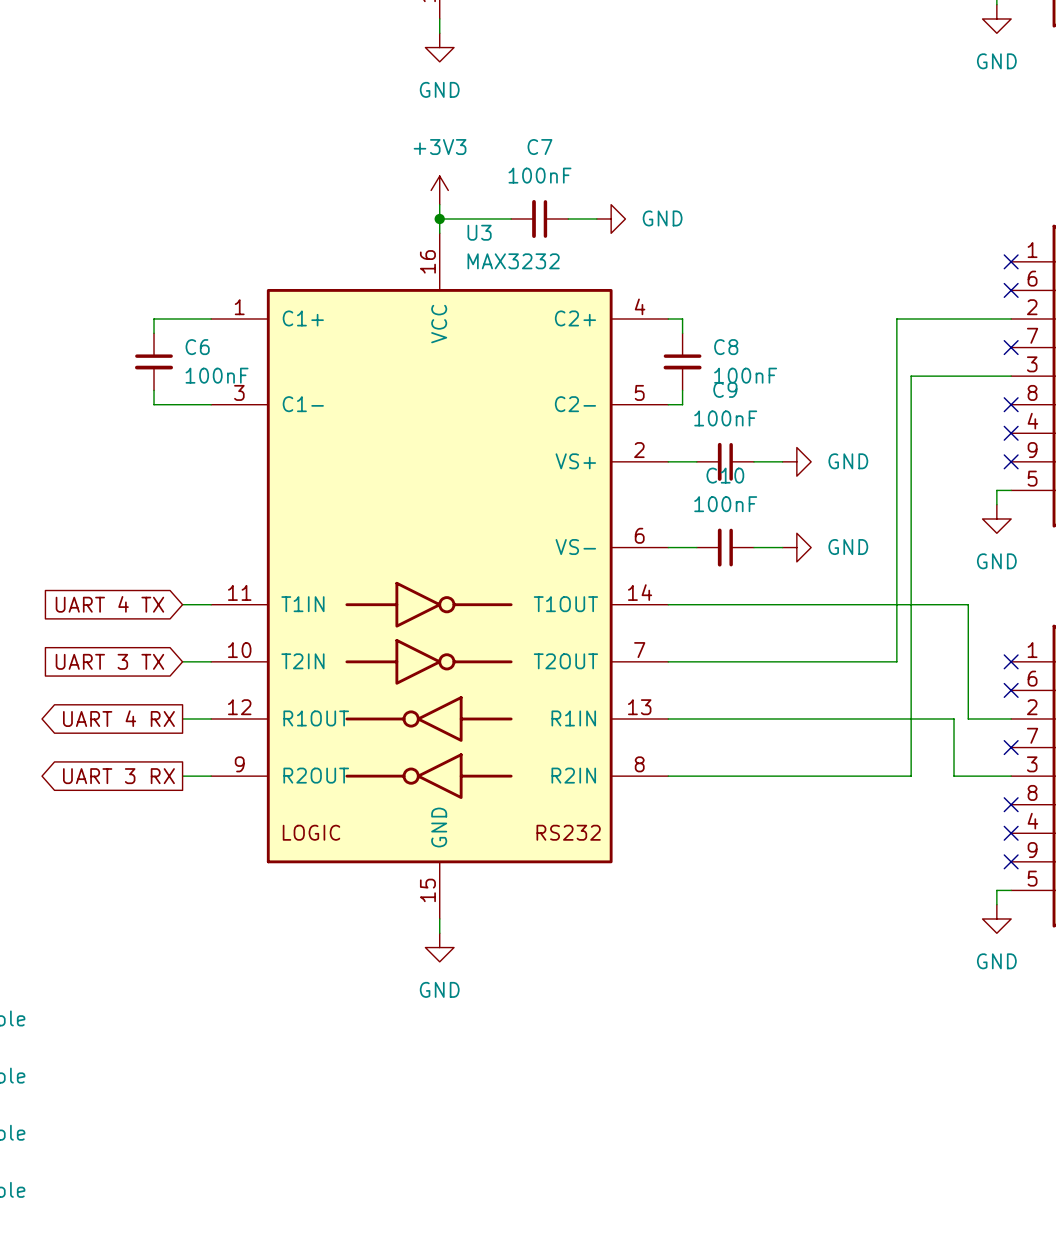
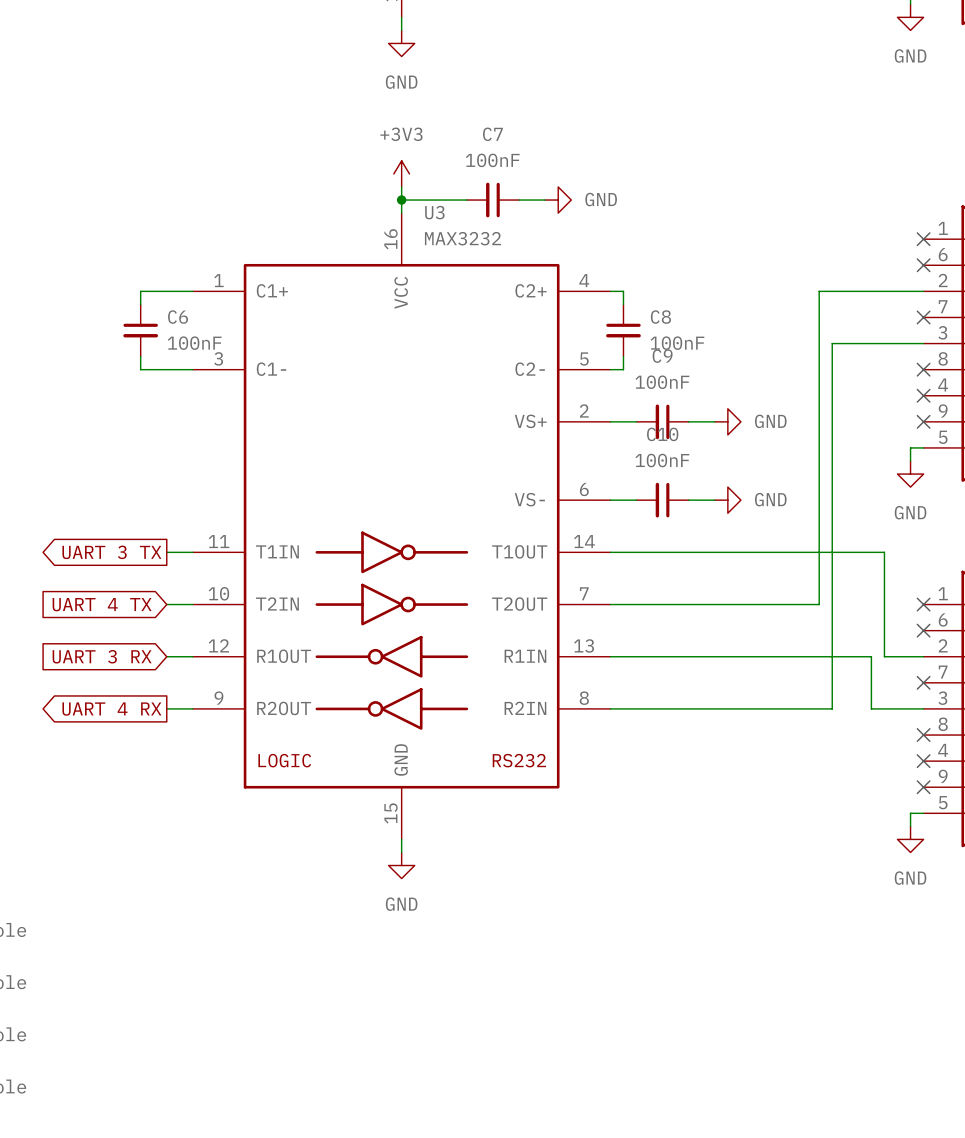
global label shape: input (109, 604) -> output (111, 552)
global label: UART 4 TX (109, 604) -> UART 3 TX (111, 552)
global label: UART 3 TX (109, 661) -> UART 4 TX (102, 604)
global label shape: output (118, 718) -> input (102, 656)
global label: UART 4 RX (118, 718) -> UART 3 RX (102, 656)
global label: UART 3 RX (118, 776) -> UART 4 RX (111, 709)

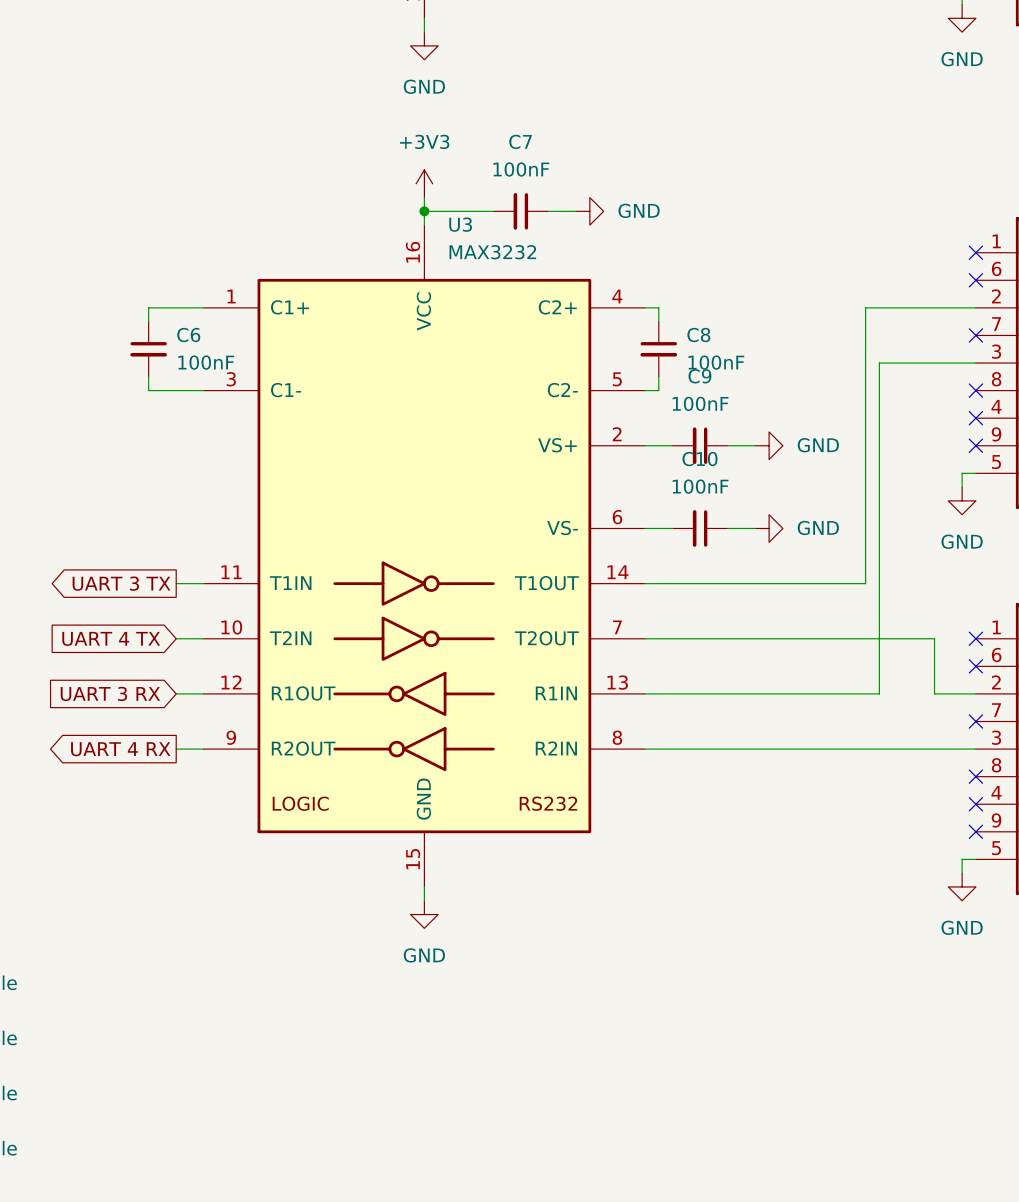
wire: (819, 604) (819, 552) (884, 552) (884, 604) -> (865, 638) (934, 638)
wire: (832, 708) (832, 656) (871, 656) (871, 708) -> (879, 749) (920, 749)

